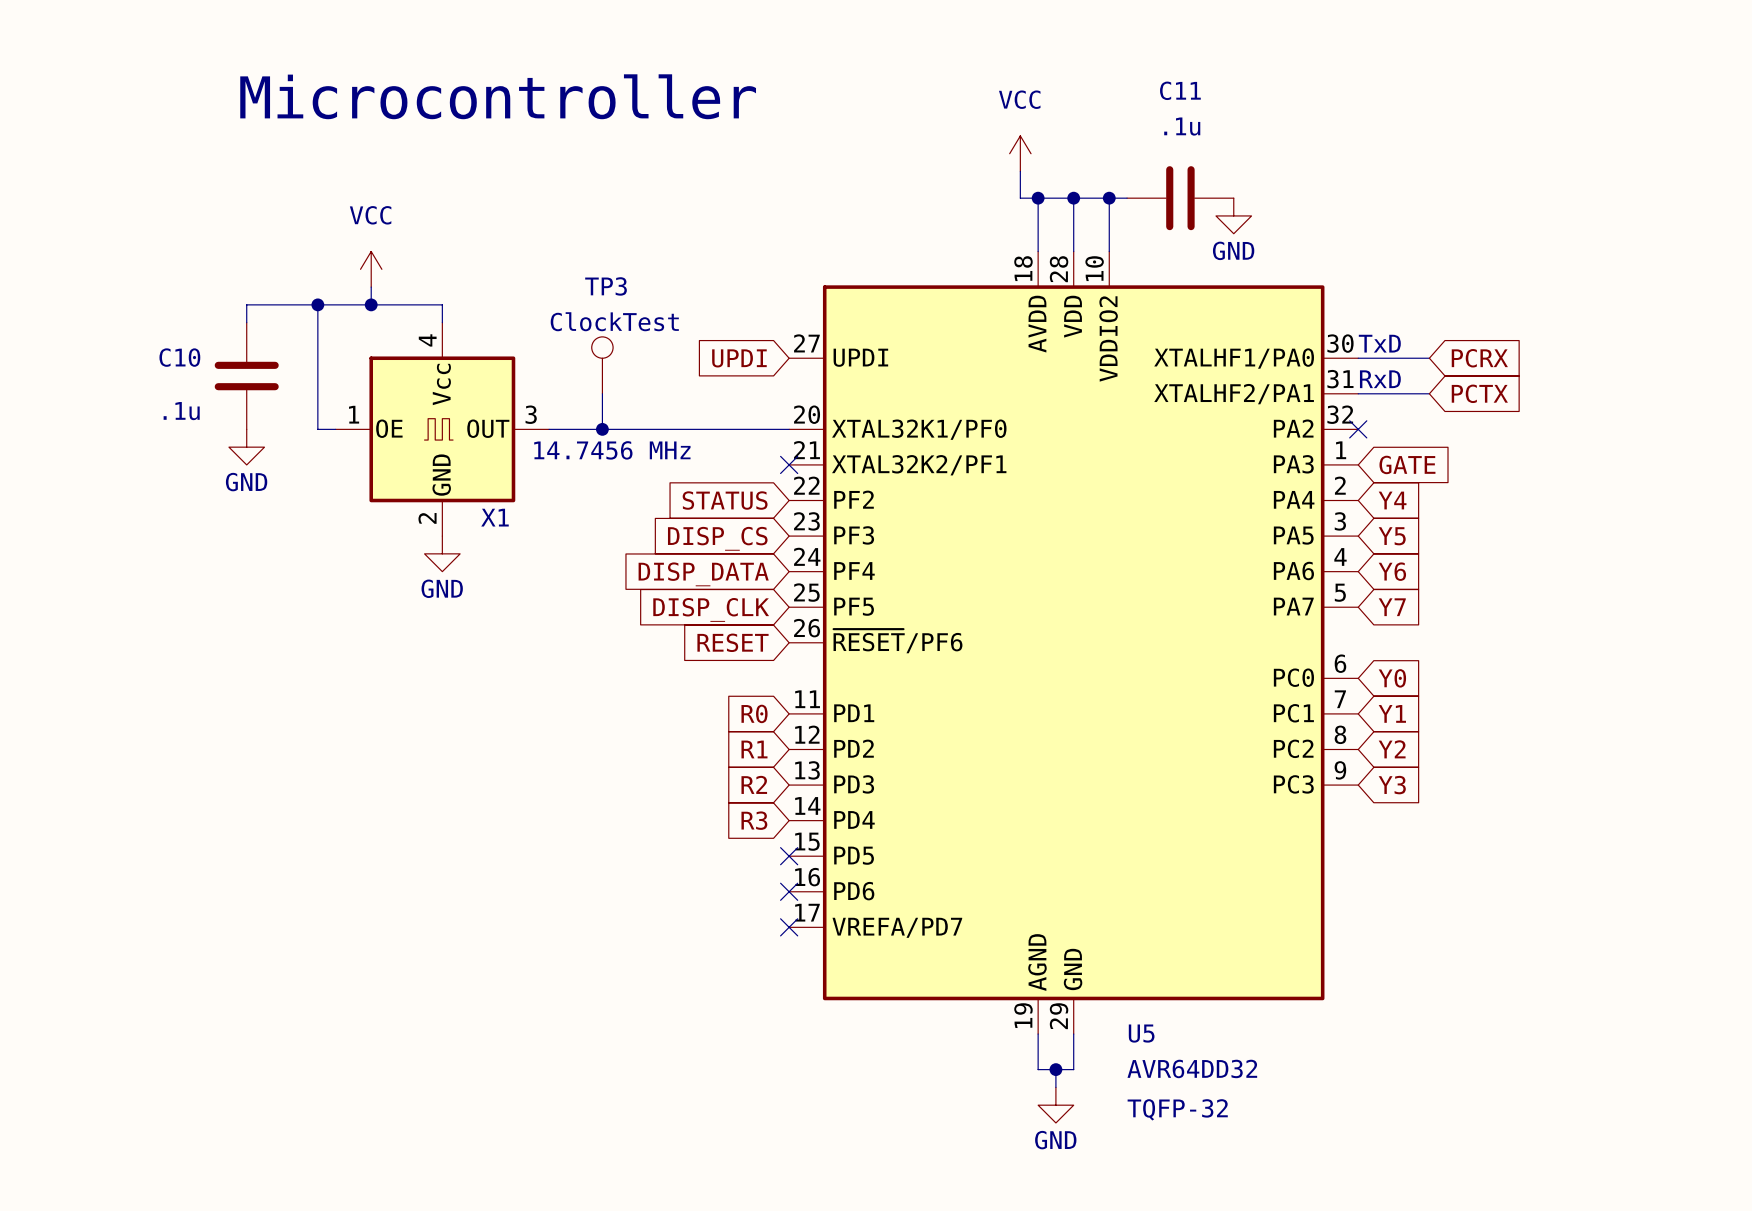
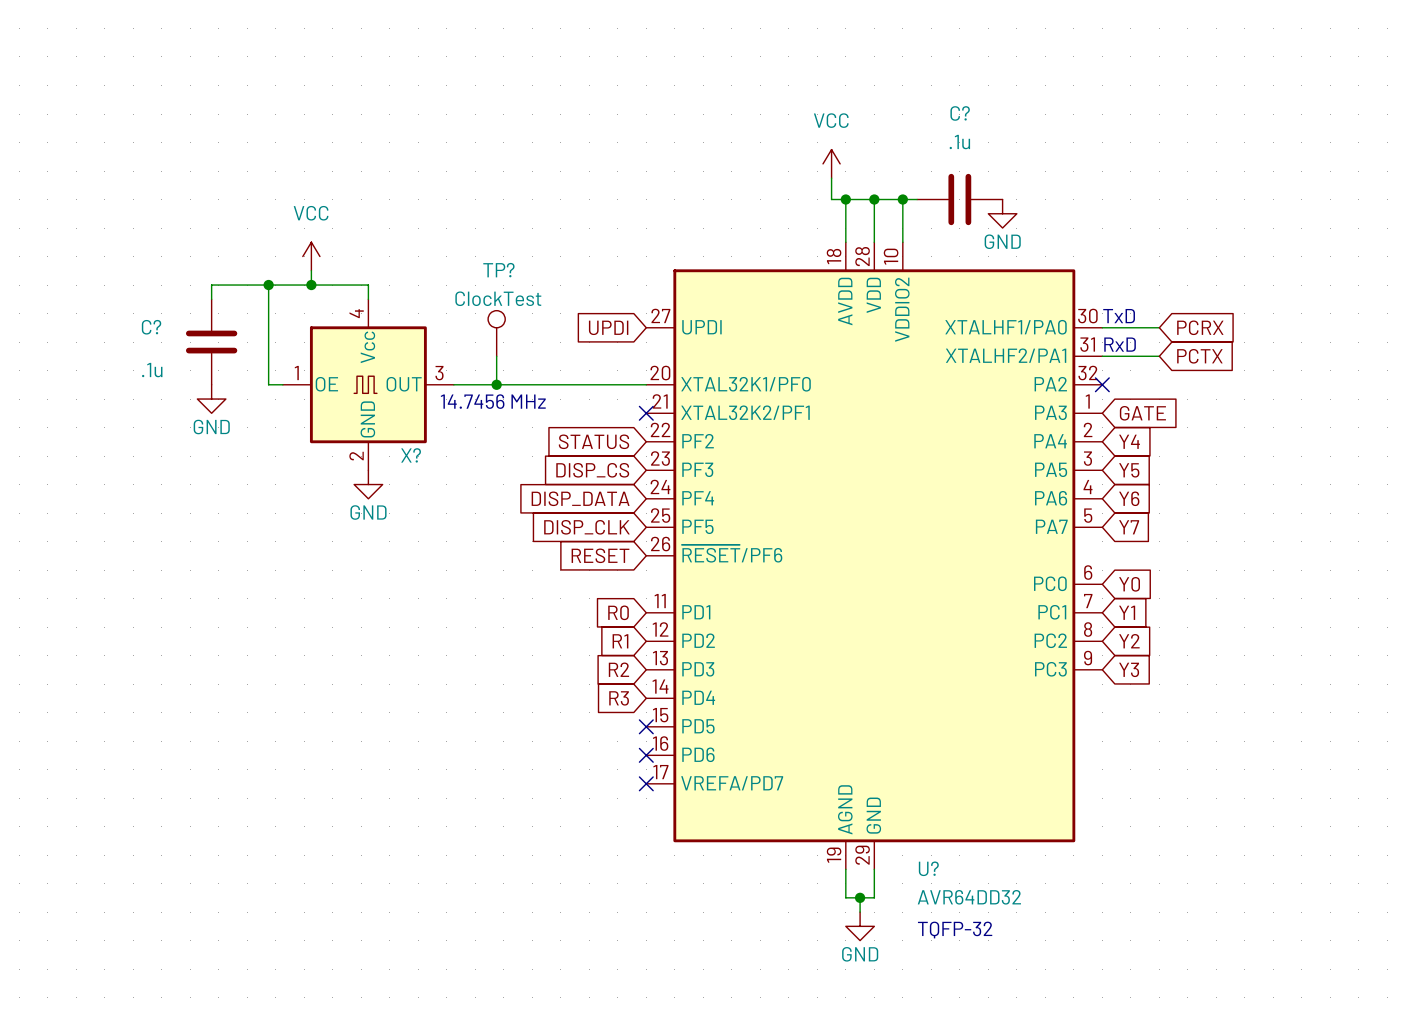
C11 name: C11 (1180, 90) -> C? (960, 113)
text: Microcontroller (498, 96) -> none
TP3 name: TP3 (606, 286) -> TP? (498, 270)
C10 name: C10 (179, 357) -> C? (151, 327)
X1 name: X1 (494, 517) -> X? (411, 455)
U5 name: U5 (1141, 1033) -> U? (928, 868)

